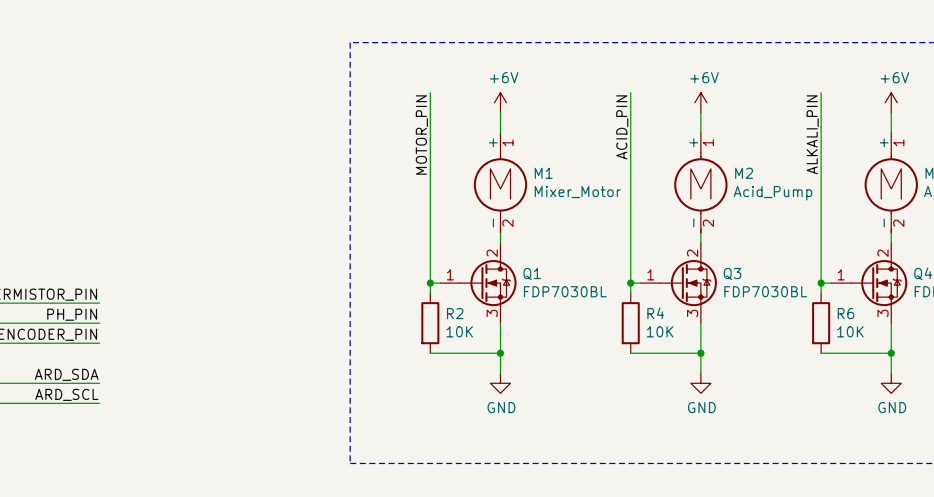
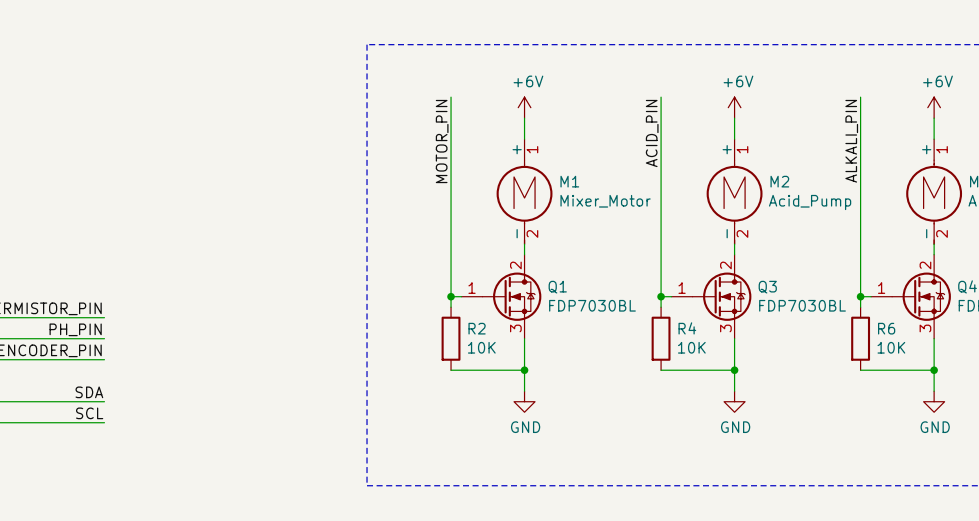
label: ARD_SDA (66, 374) -> SDA (89, 392)
label: ARD_SCL (66, 394) -> SCL (89, 413)

